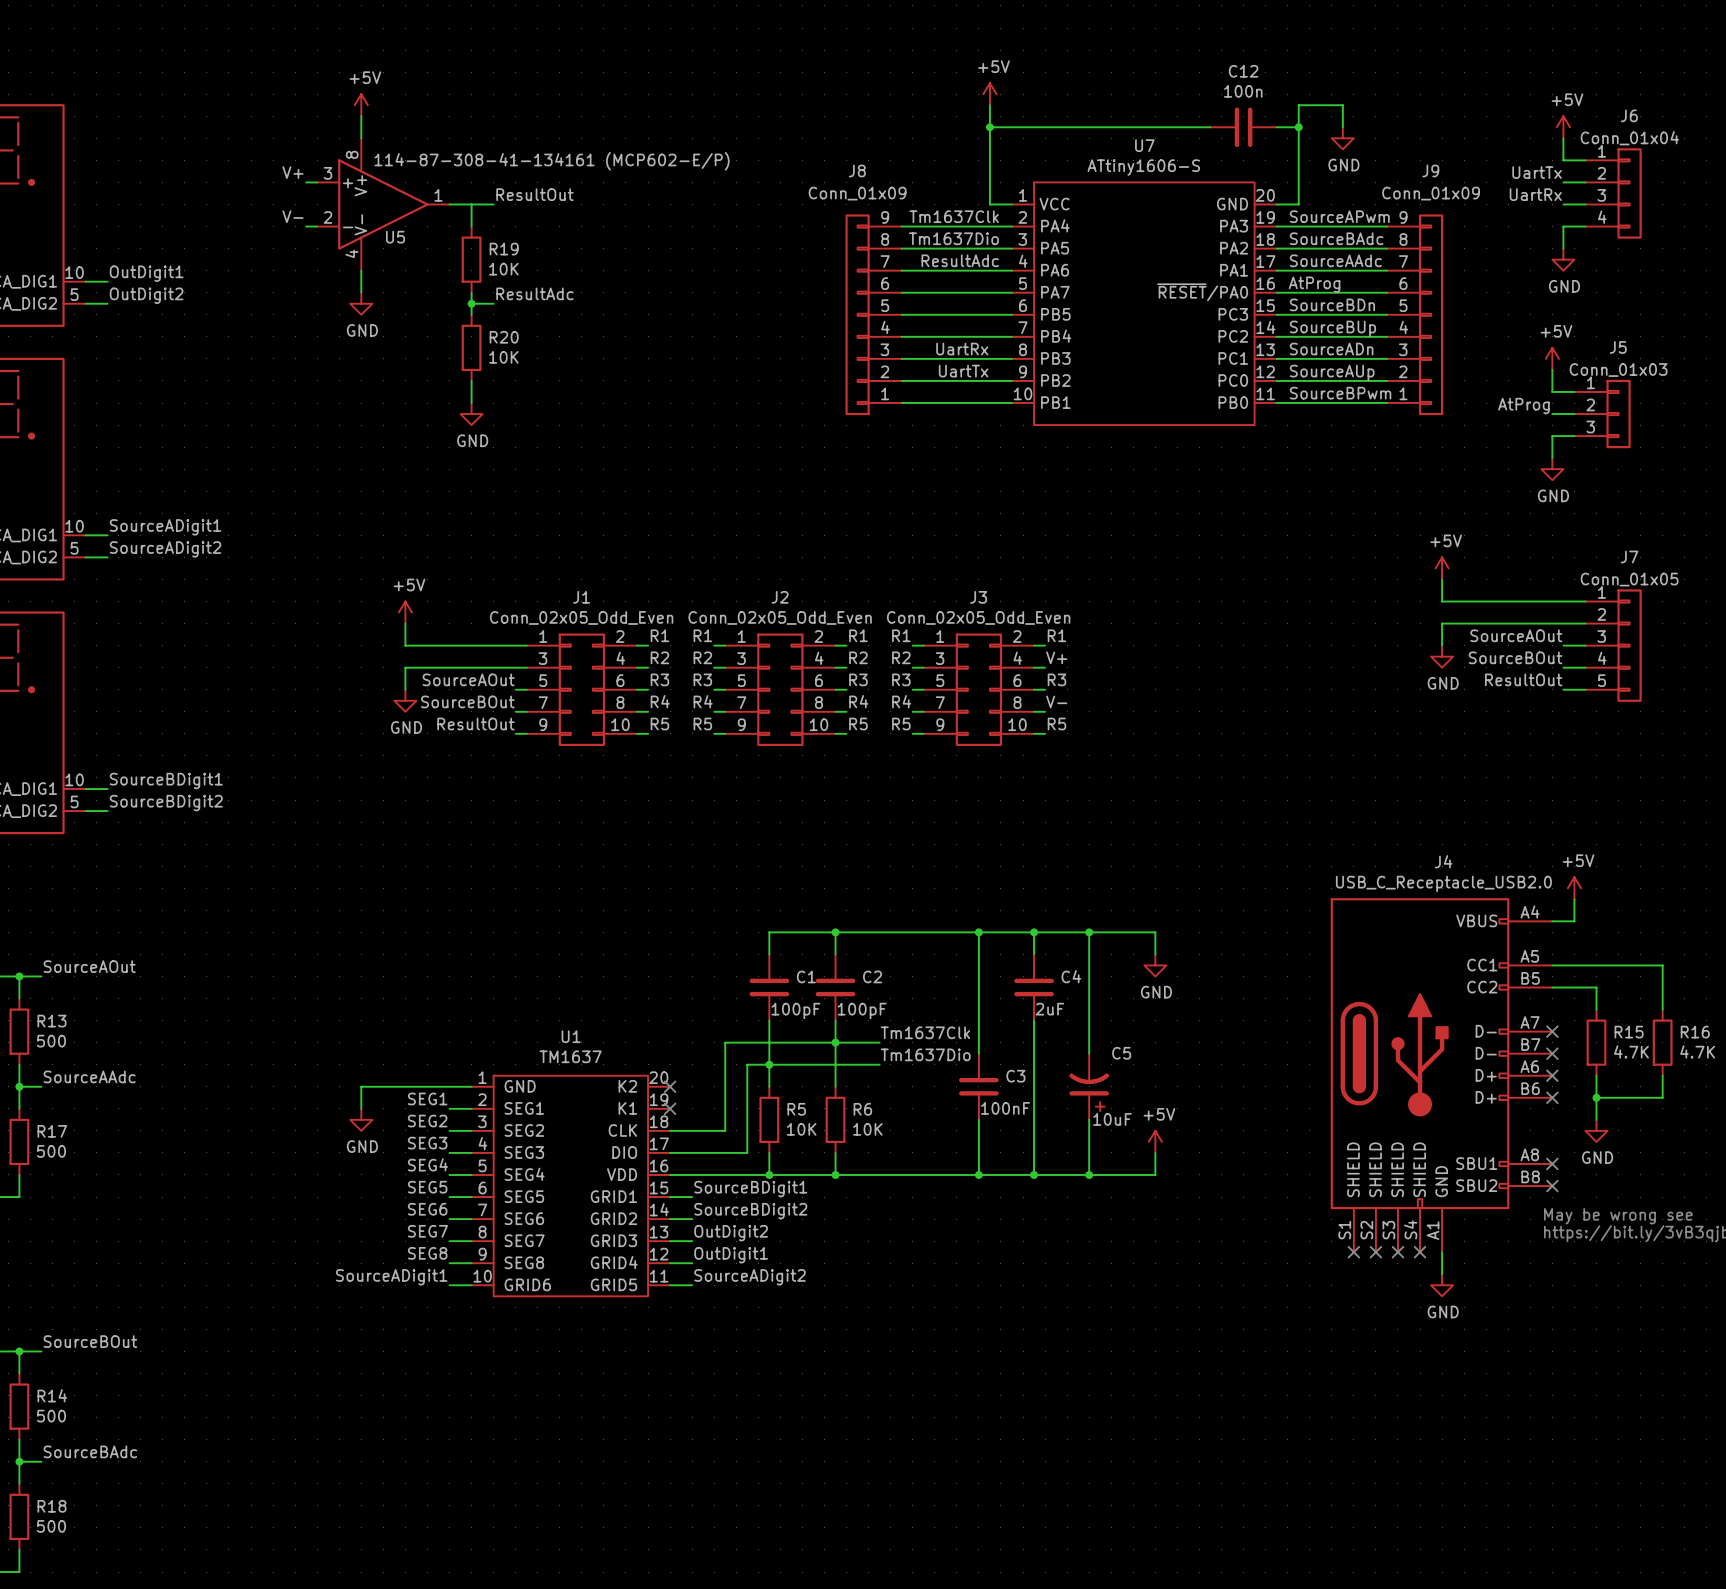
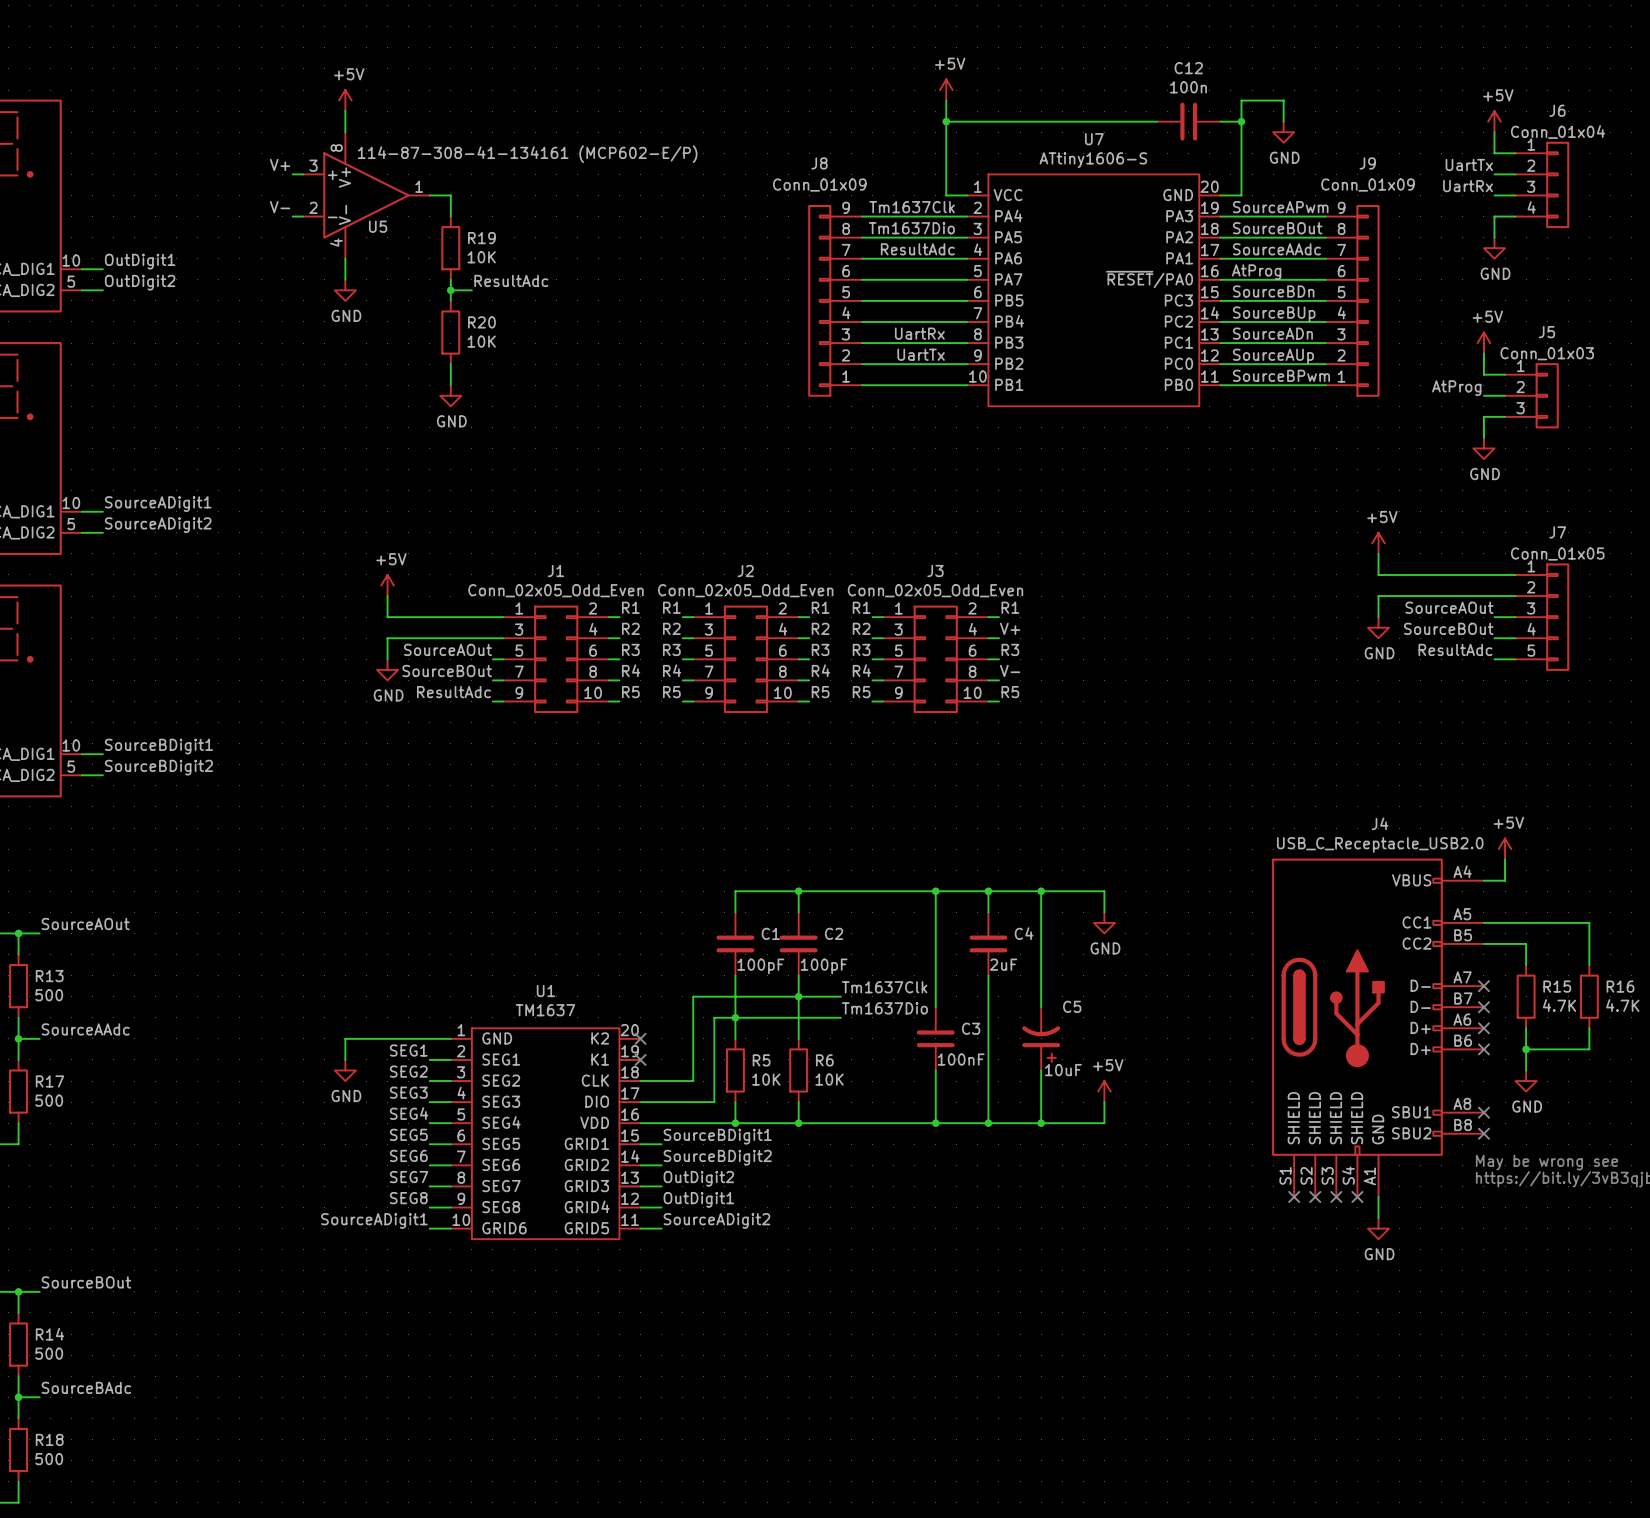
label: ResultOut (534, 194) -> none
wire: (471, 204) (493, 204) -> none
label: SourceBAdc (1336, 238) -> SourceBOut (1277, 228)
label: ResultOut (1523, 679) -> ResultAdc (1455, 649)
label: ResultOut (475, 724) -> ResultAdc (453, 692)

